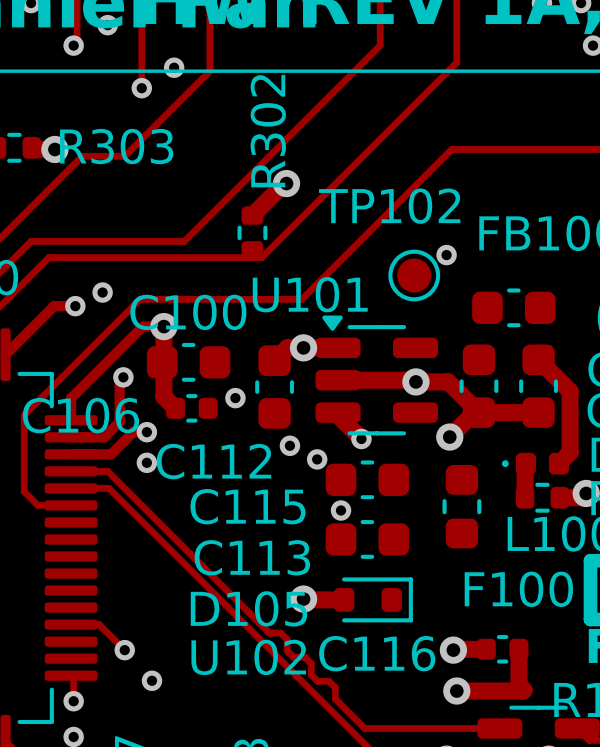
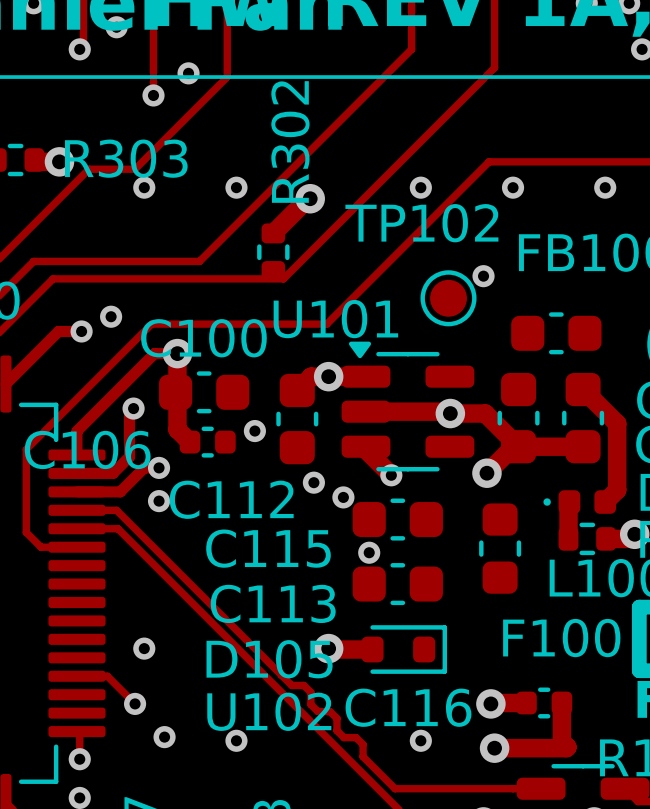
via: none -> (144, 187)
via: none -> (236, 187)
via: none -> (420, 187)
via: none -> (513, 187)
via: none -> (605, 187)
via: none -> (144, 648)
via: none -> (236, 740)
via: none -> (420, 740)

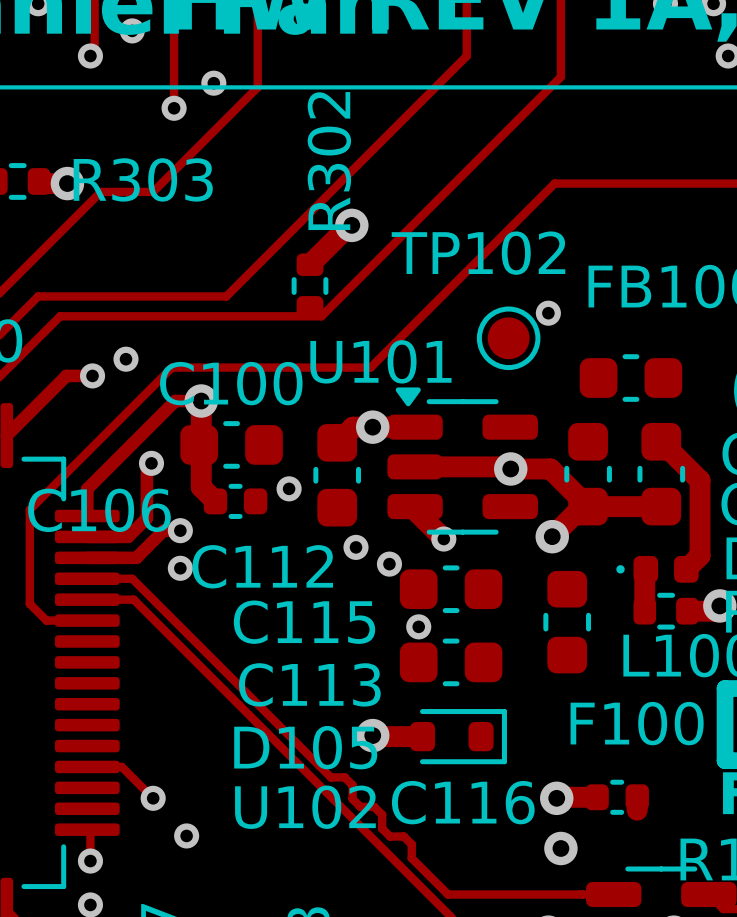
via: (144, 187) -> none
via: (236, 187) -> none
via: (420, 187) -> none
via: (513, 187) -> none
via: (605, 187) -> none
via: (144, 648) -> none
track: (561, 714) (561, 741) (566, 748) (494, 748) -> none
via: (236, 740) -> none
via: (420, 740) -> none

